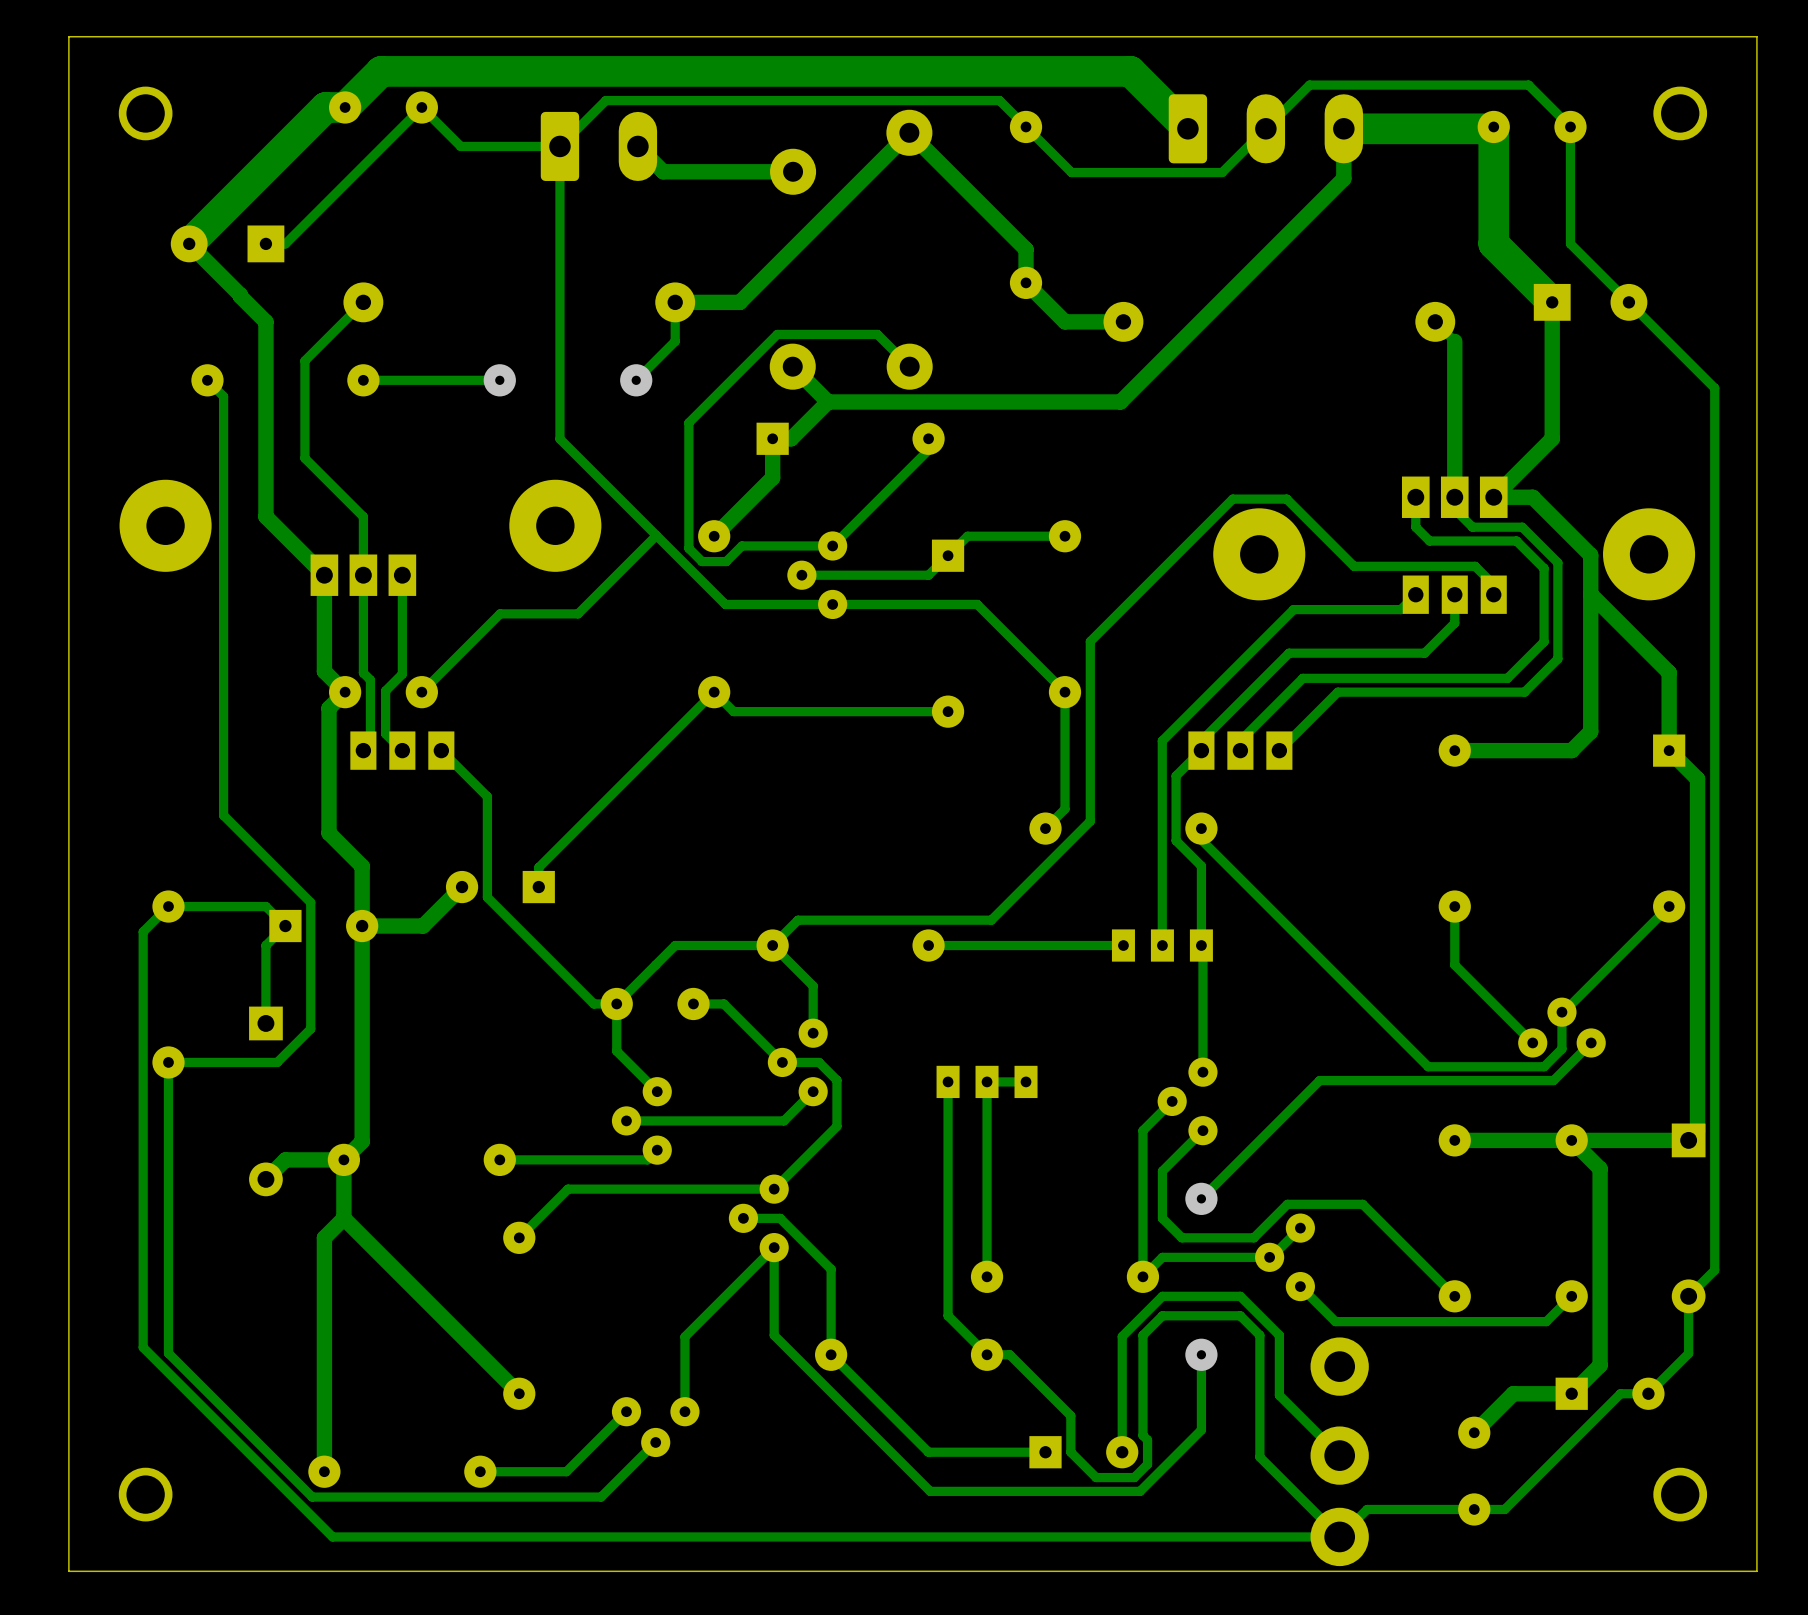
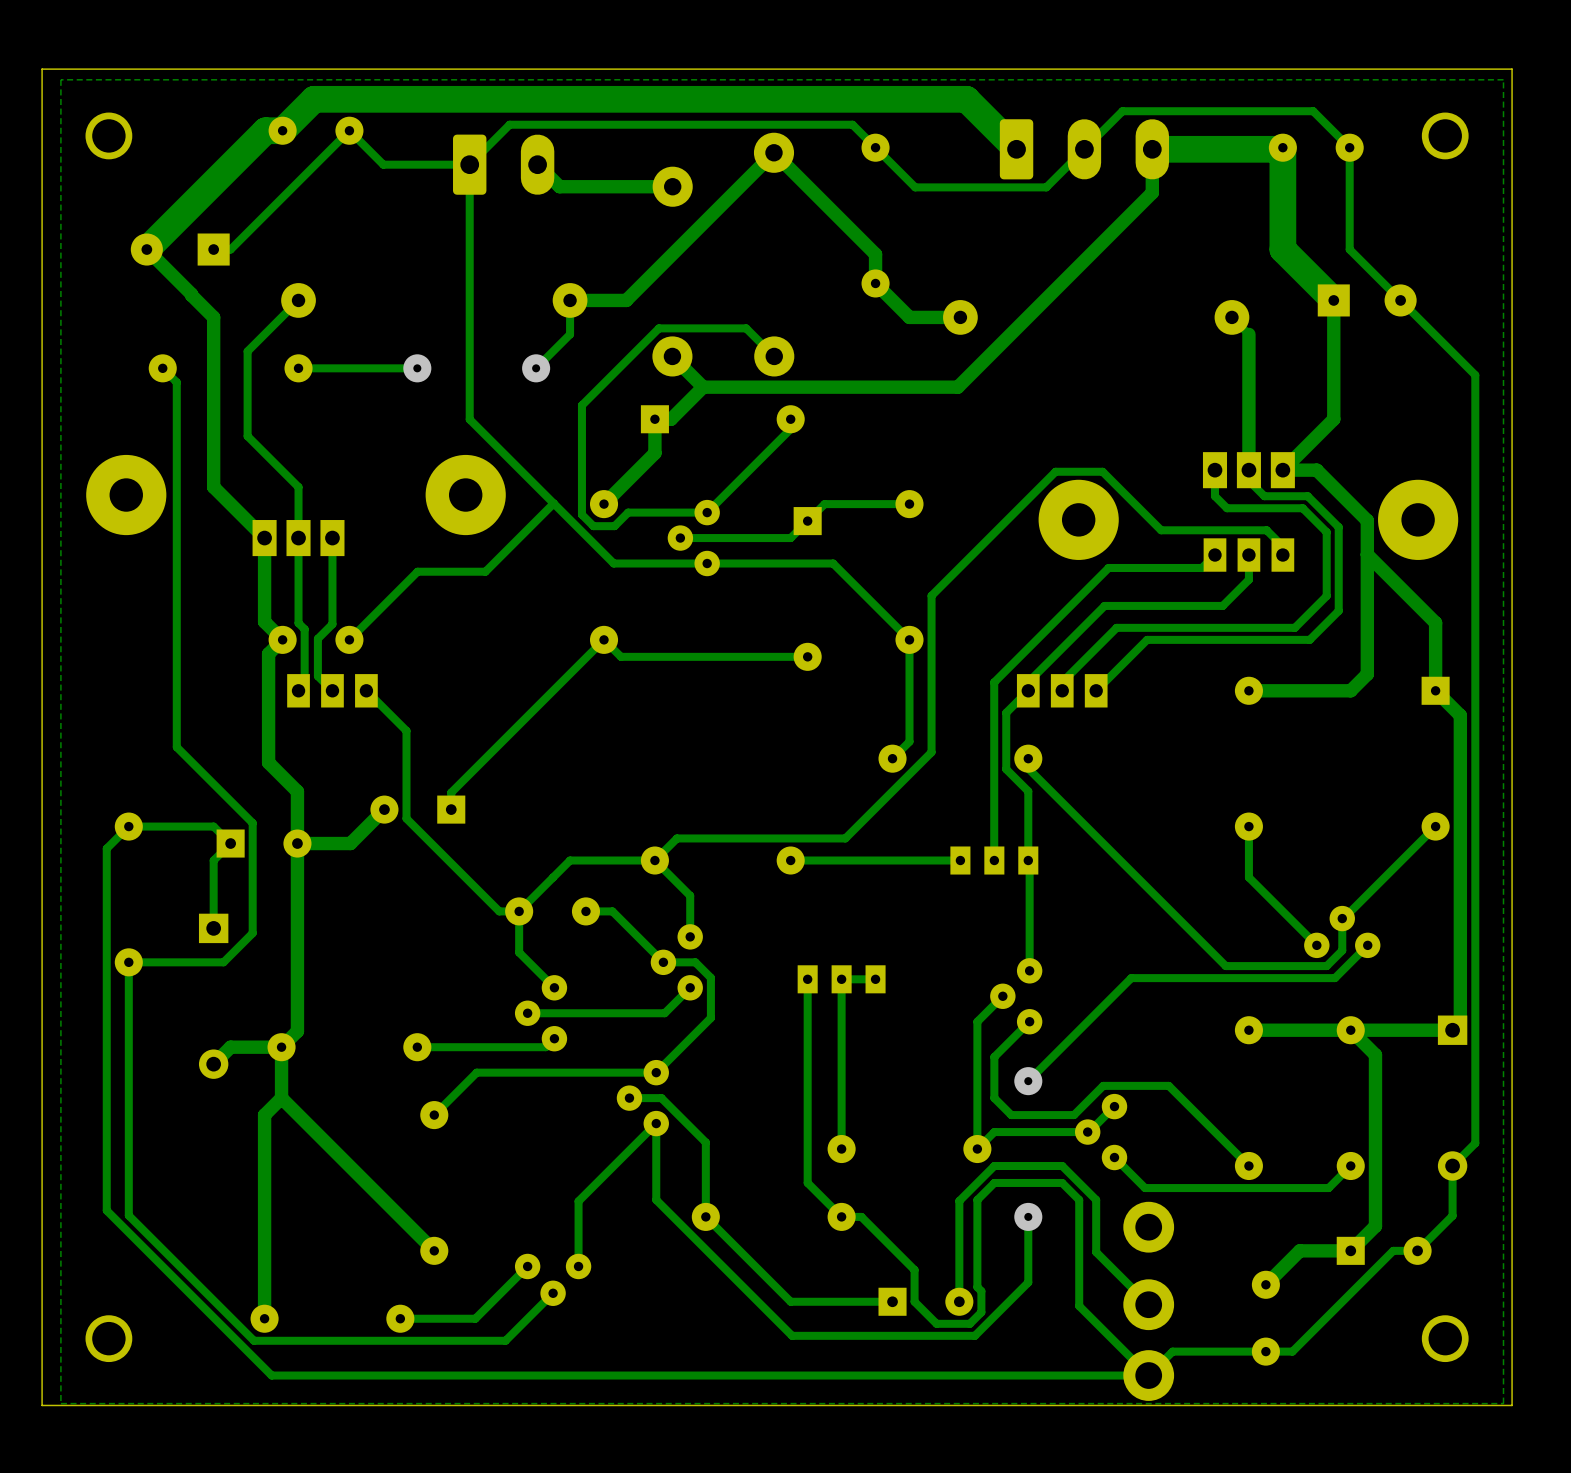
bottom zone outline: none -> (1503, 79) (1503, 1403) (60, 1403) (60, 79) (1503, 79)

